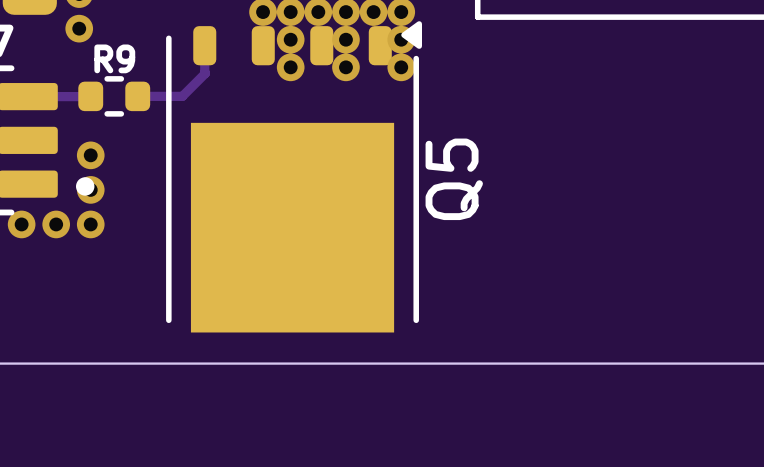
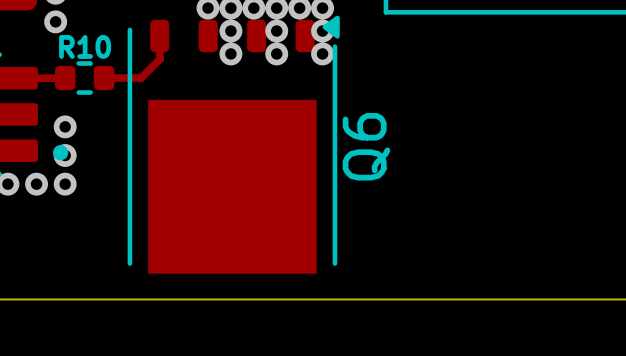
R9 name: R9 (114, 58) -> R10 (85, 46)
Q5 name: Q5 (454, 179) -> Q6 (366, 146)

